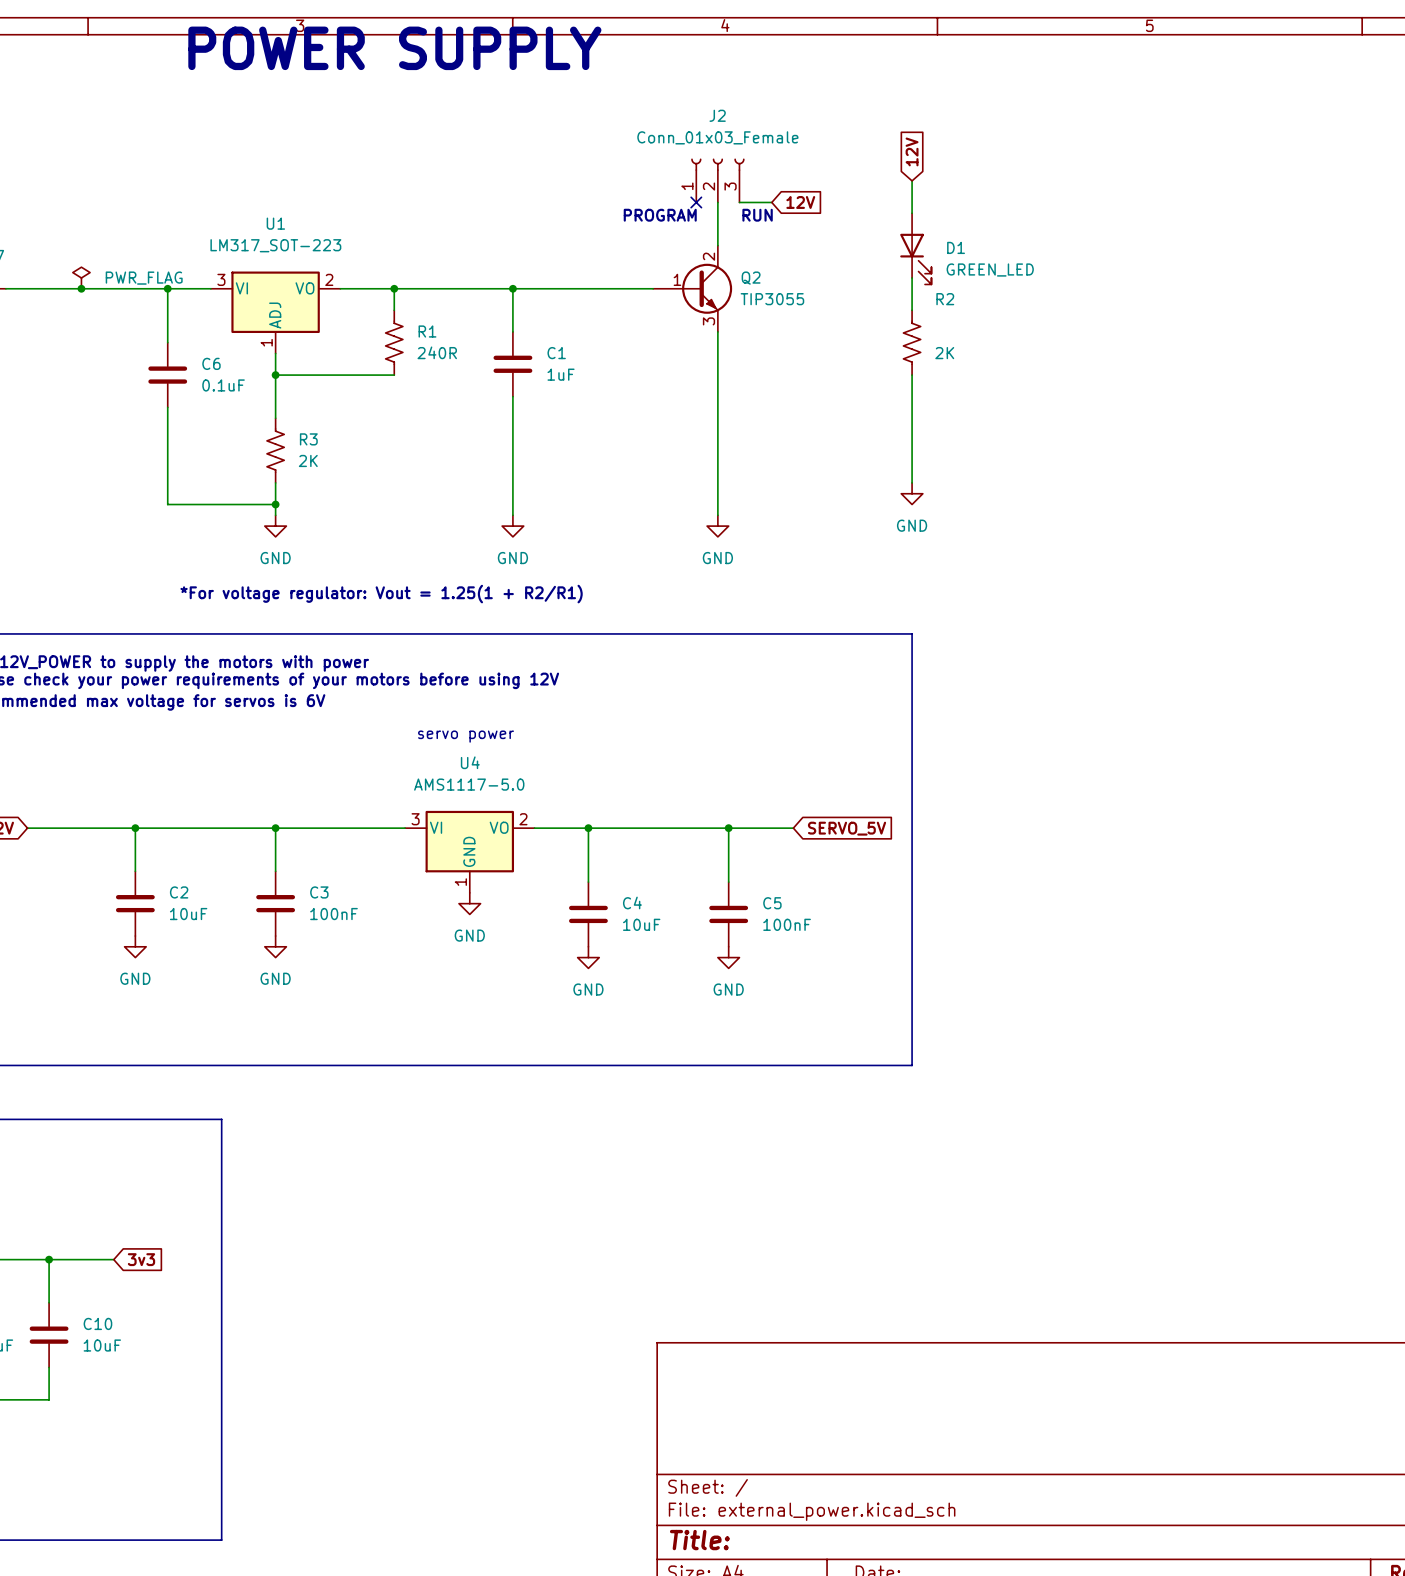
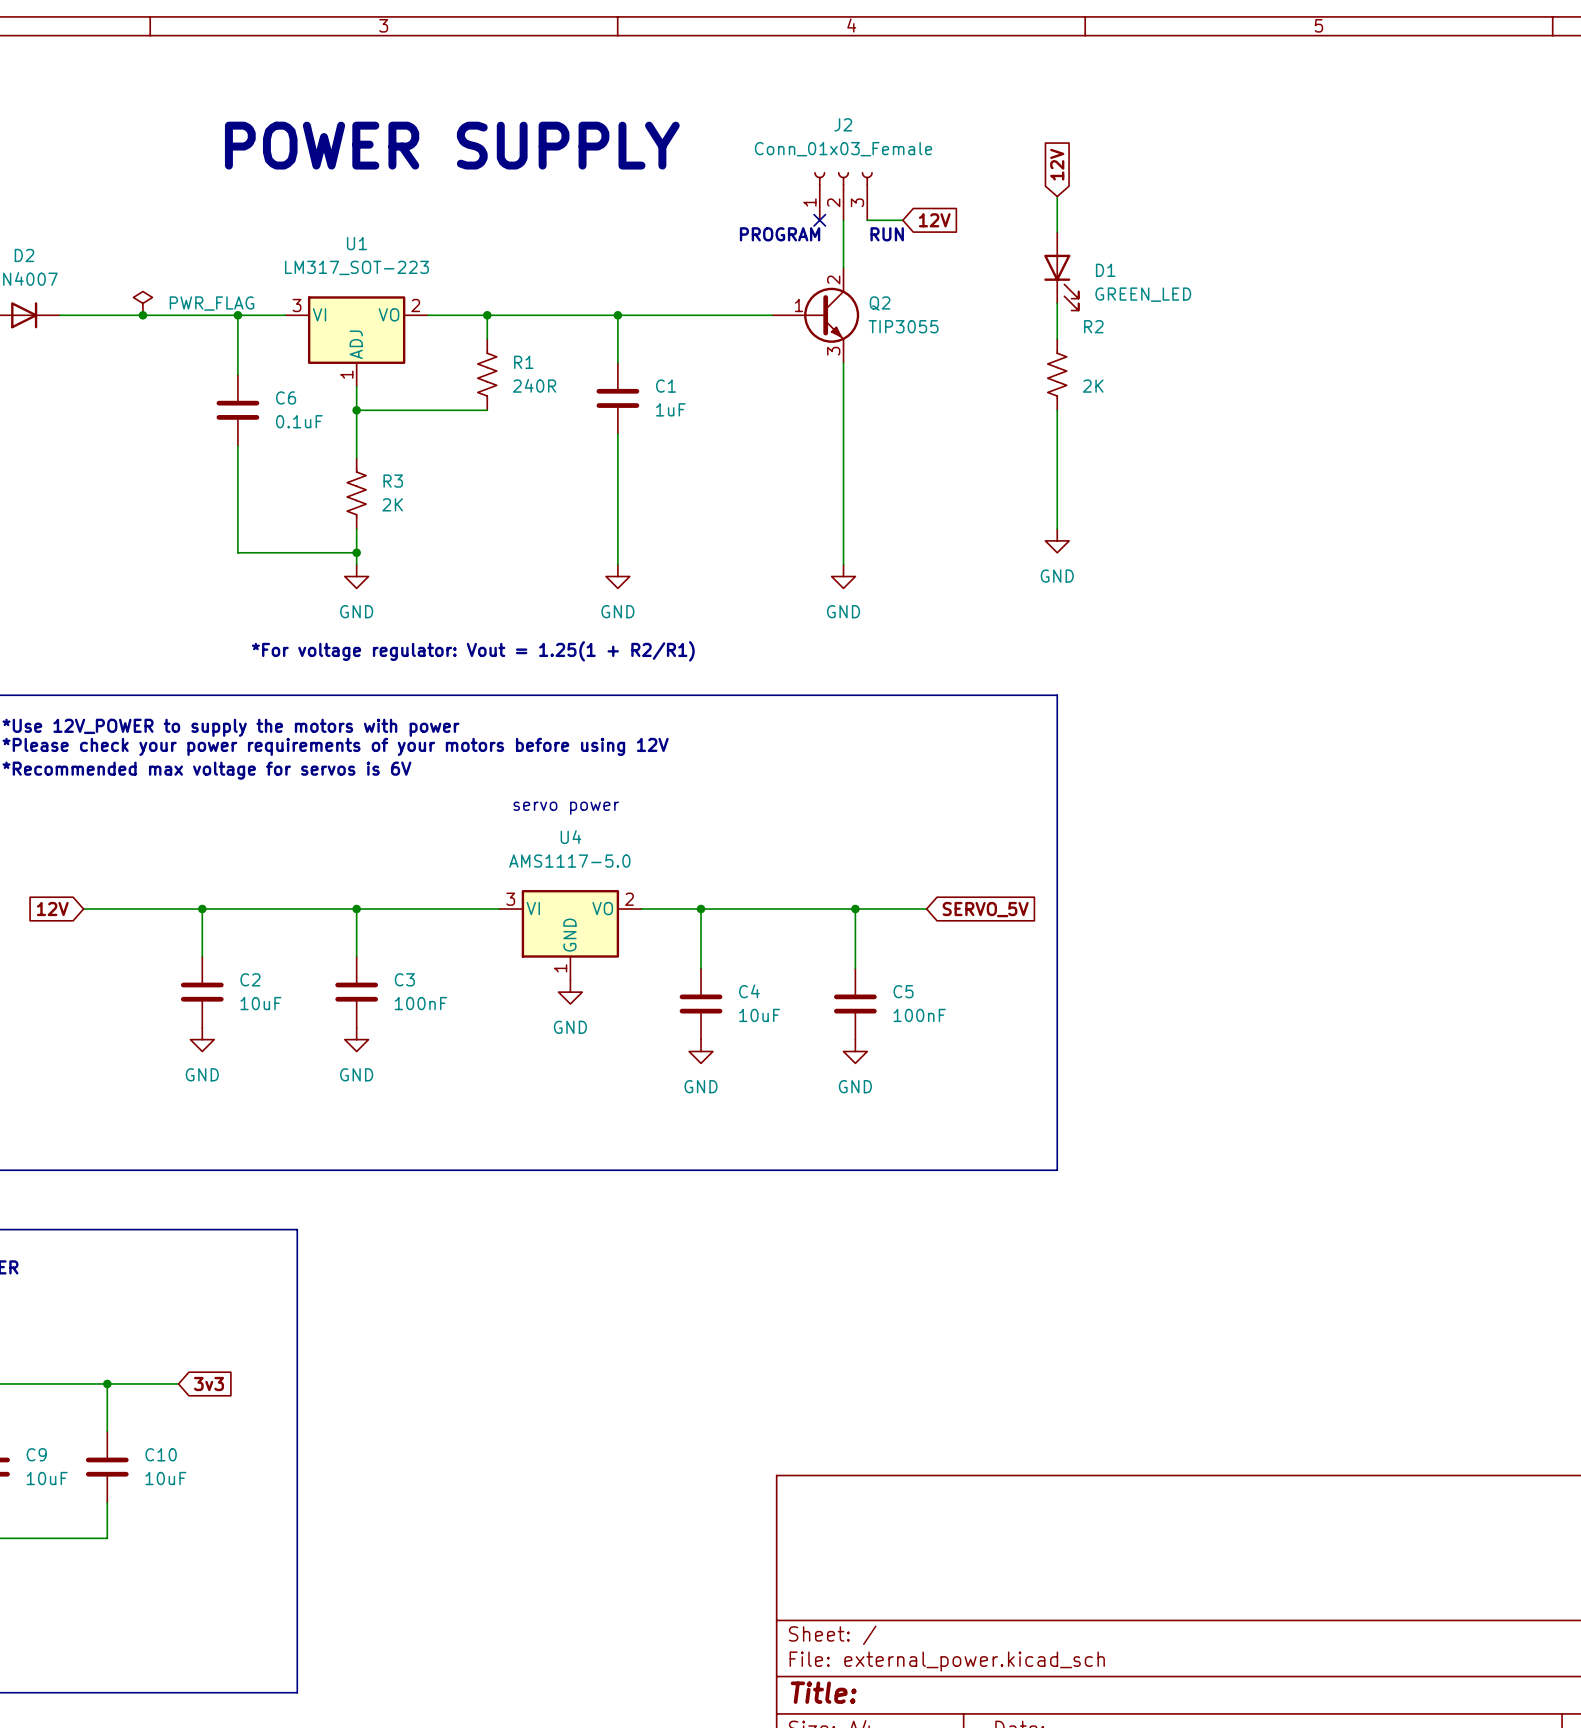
text position: POWER SUPPLY (394, 48) -> POWER SUPPLY (452, 145)

